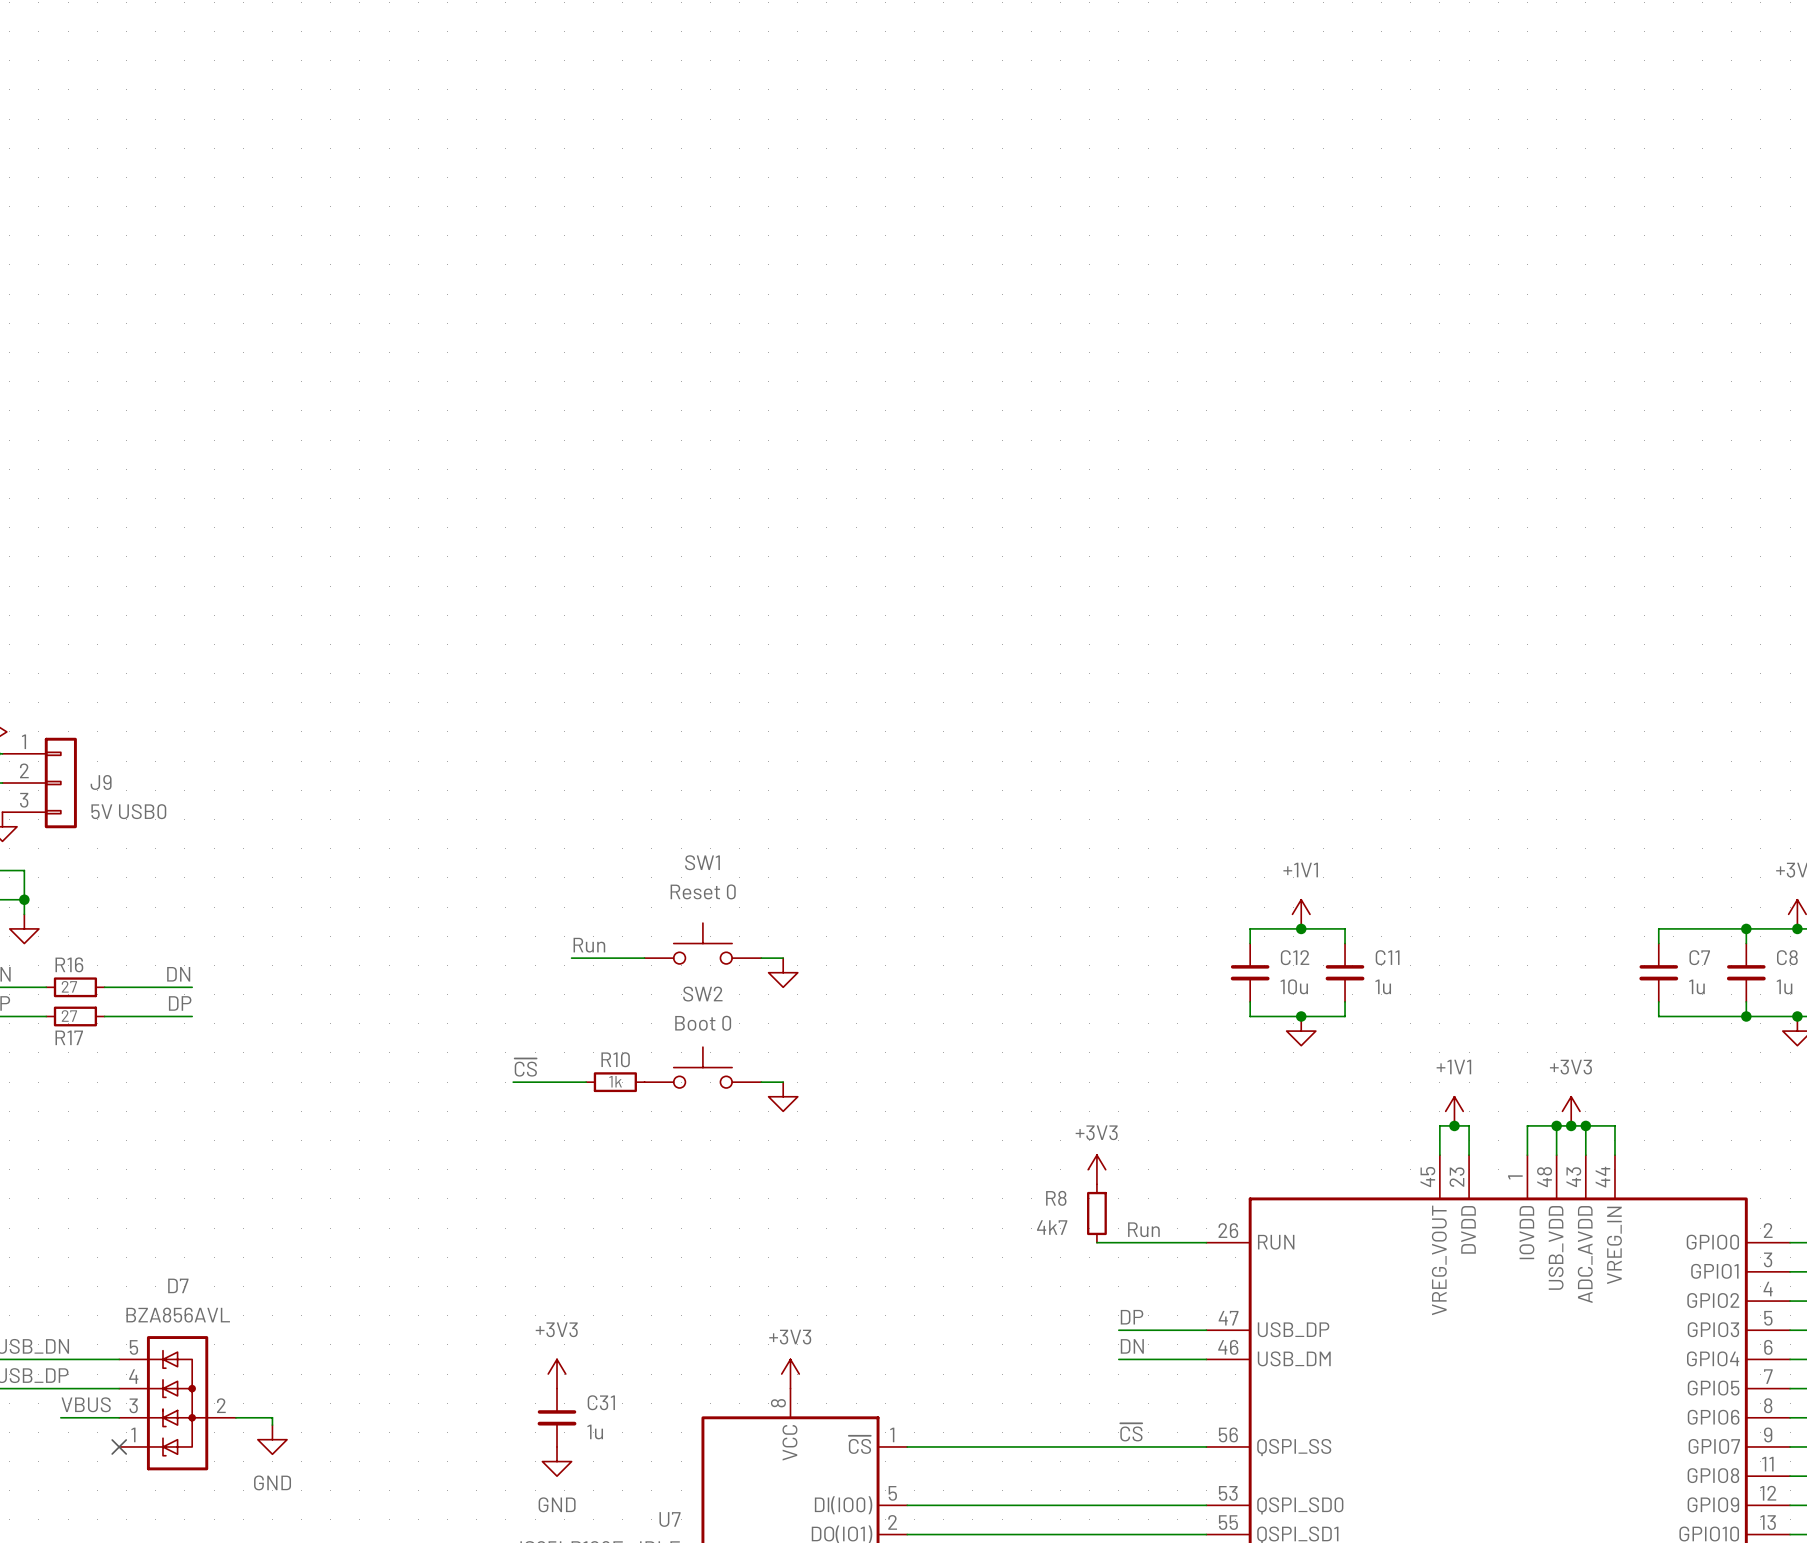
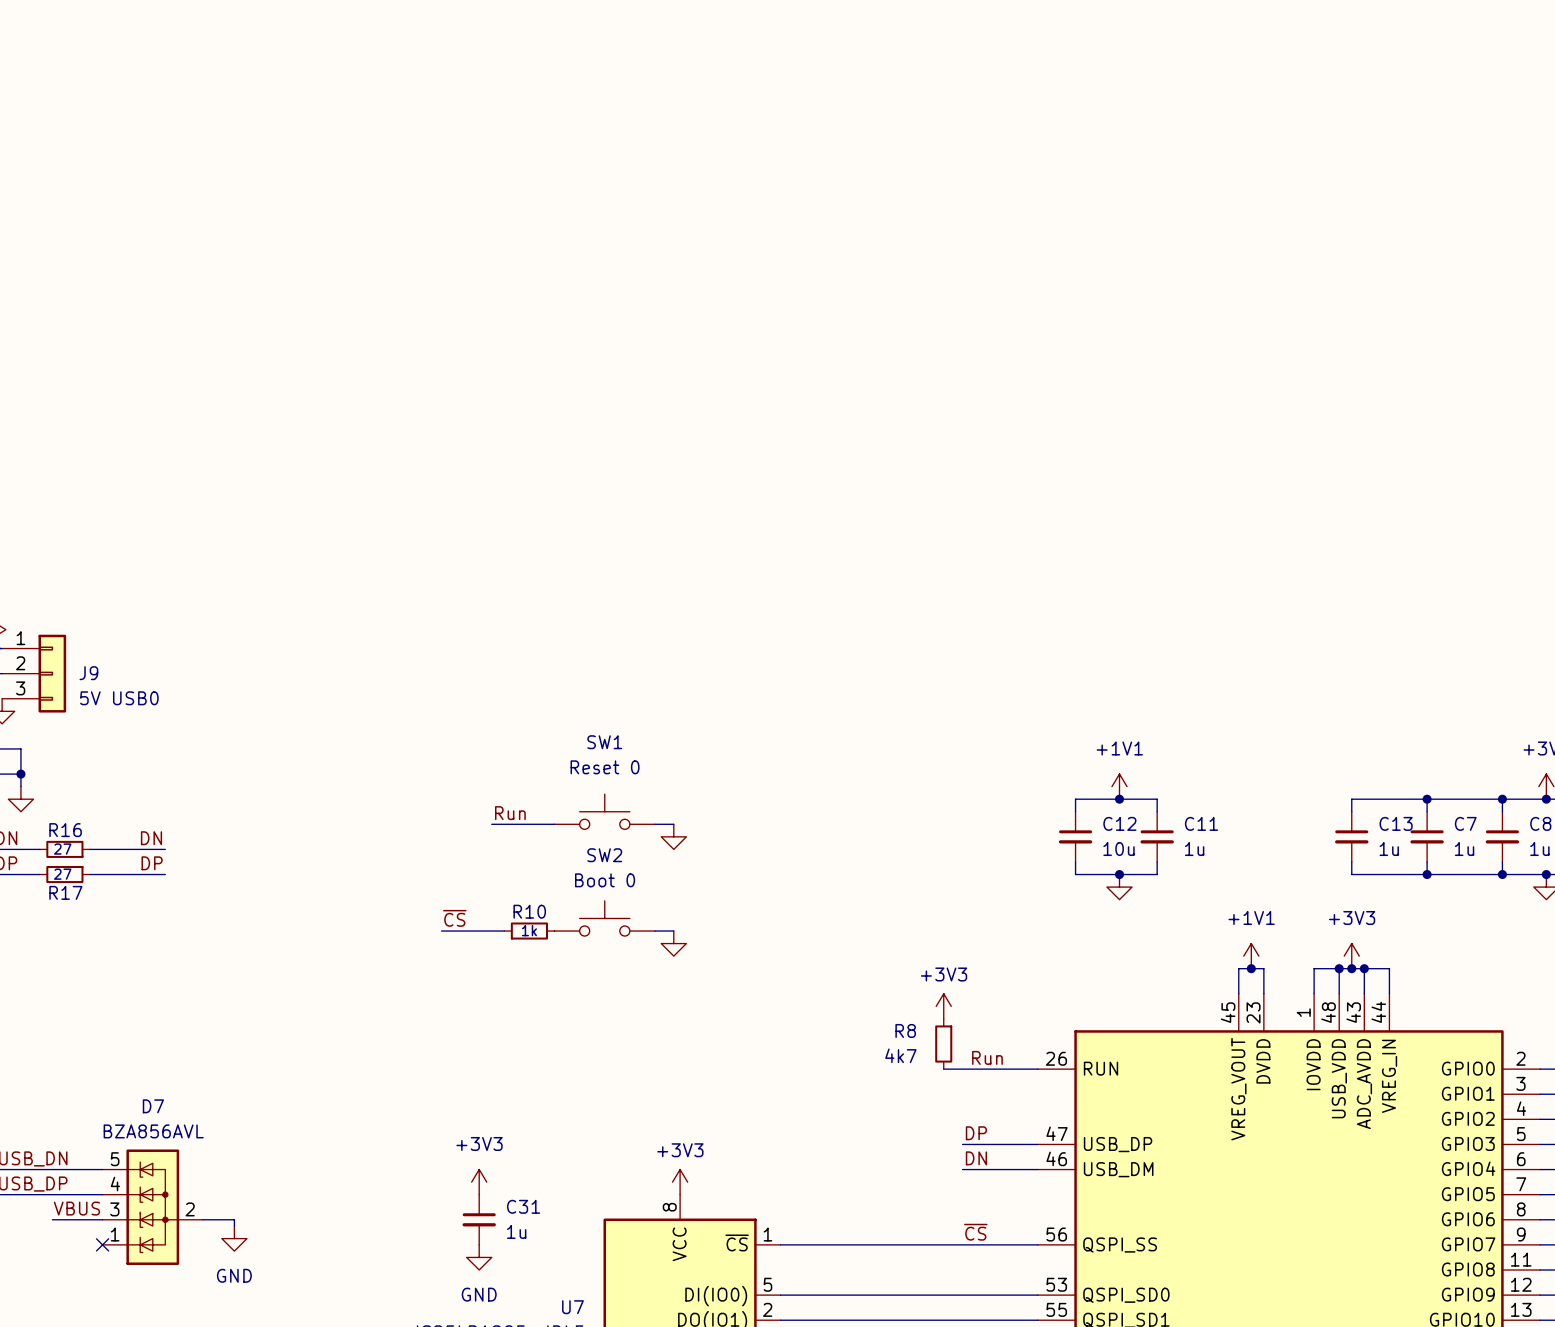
wire: none -> (1427, 799) (1351, 799) (1351, 811)
junction: none -> (1427, 799)
C13: none -> 1u (1351, 836)
wire: none -> (1351, 861) (1351, 874) (1427, 874)
junction: none -> (1427, 874)

